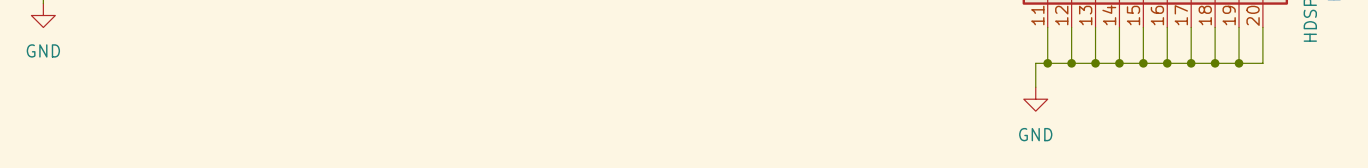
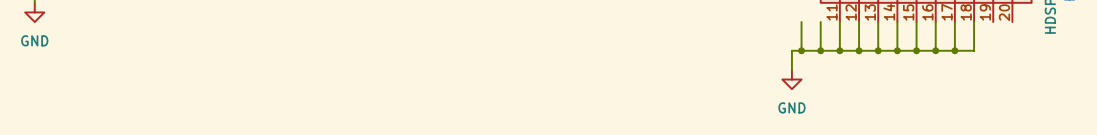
wire: none -> (801, 22) (801, 50)
wire: (1239, 27) (1239, 63) -> (820, 22) (820, 50)
wire: (1262, 27) (1262, 63) (1215, 63) -> none
junction: none -> (801, 50)
junction: none -> (820, 50)
wire: (1035, 63) (1035, 87) -> (830, 50) (791, 50) (791, 69)
junction: (1215, 63) -> none
junction: (1239, 63) -> none
power symbol position: GND (1035, 99) -> GND (791, 79)

